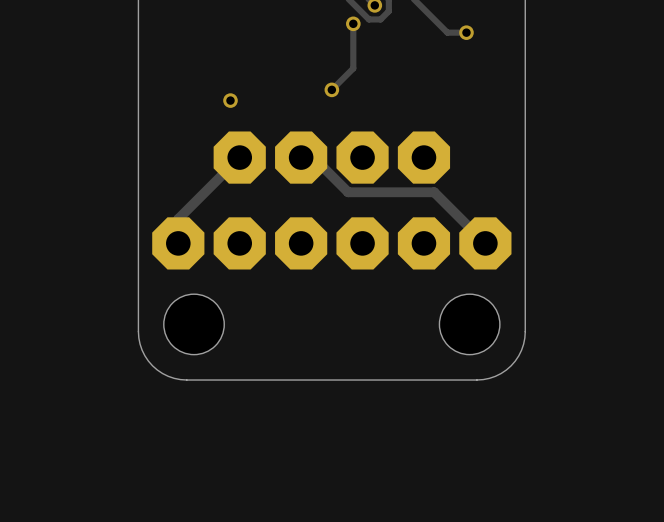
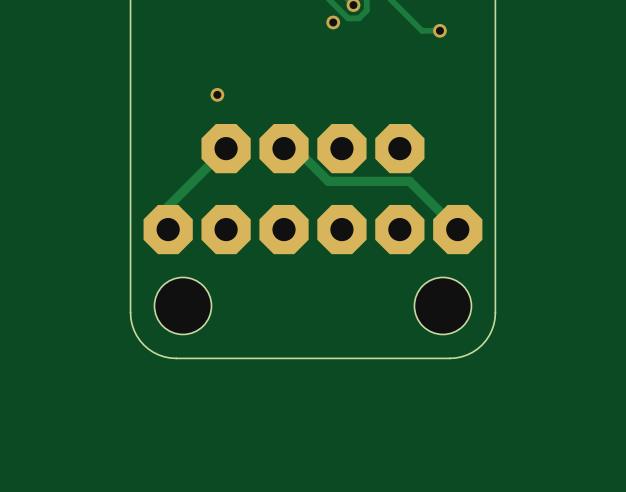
track: (353, 23) (353, 68) (331, 89) -> none
via: (331, 89) -> none

